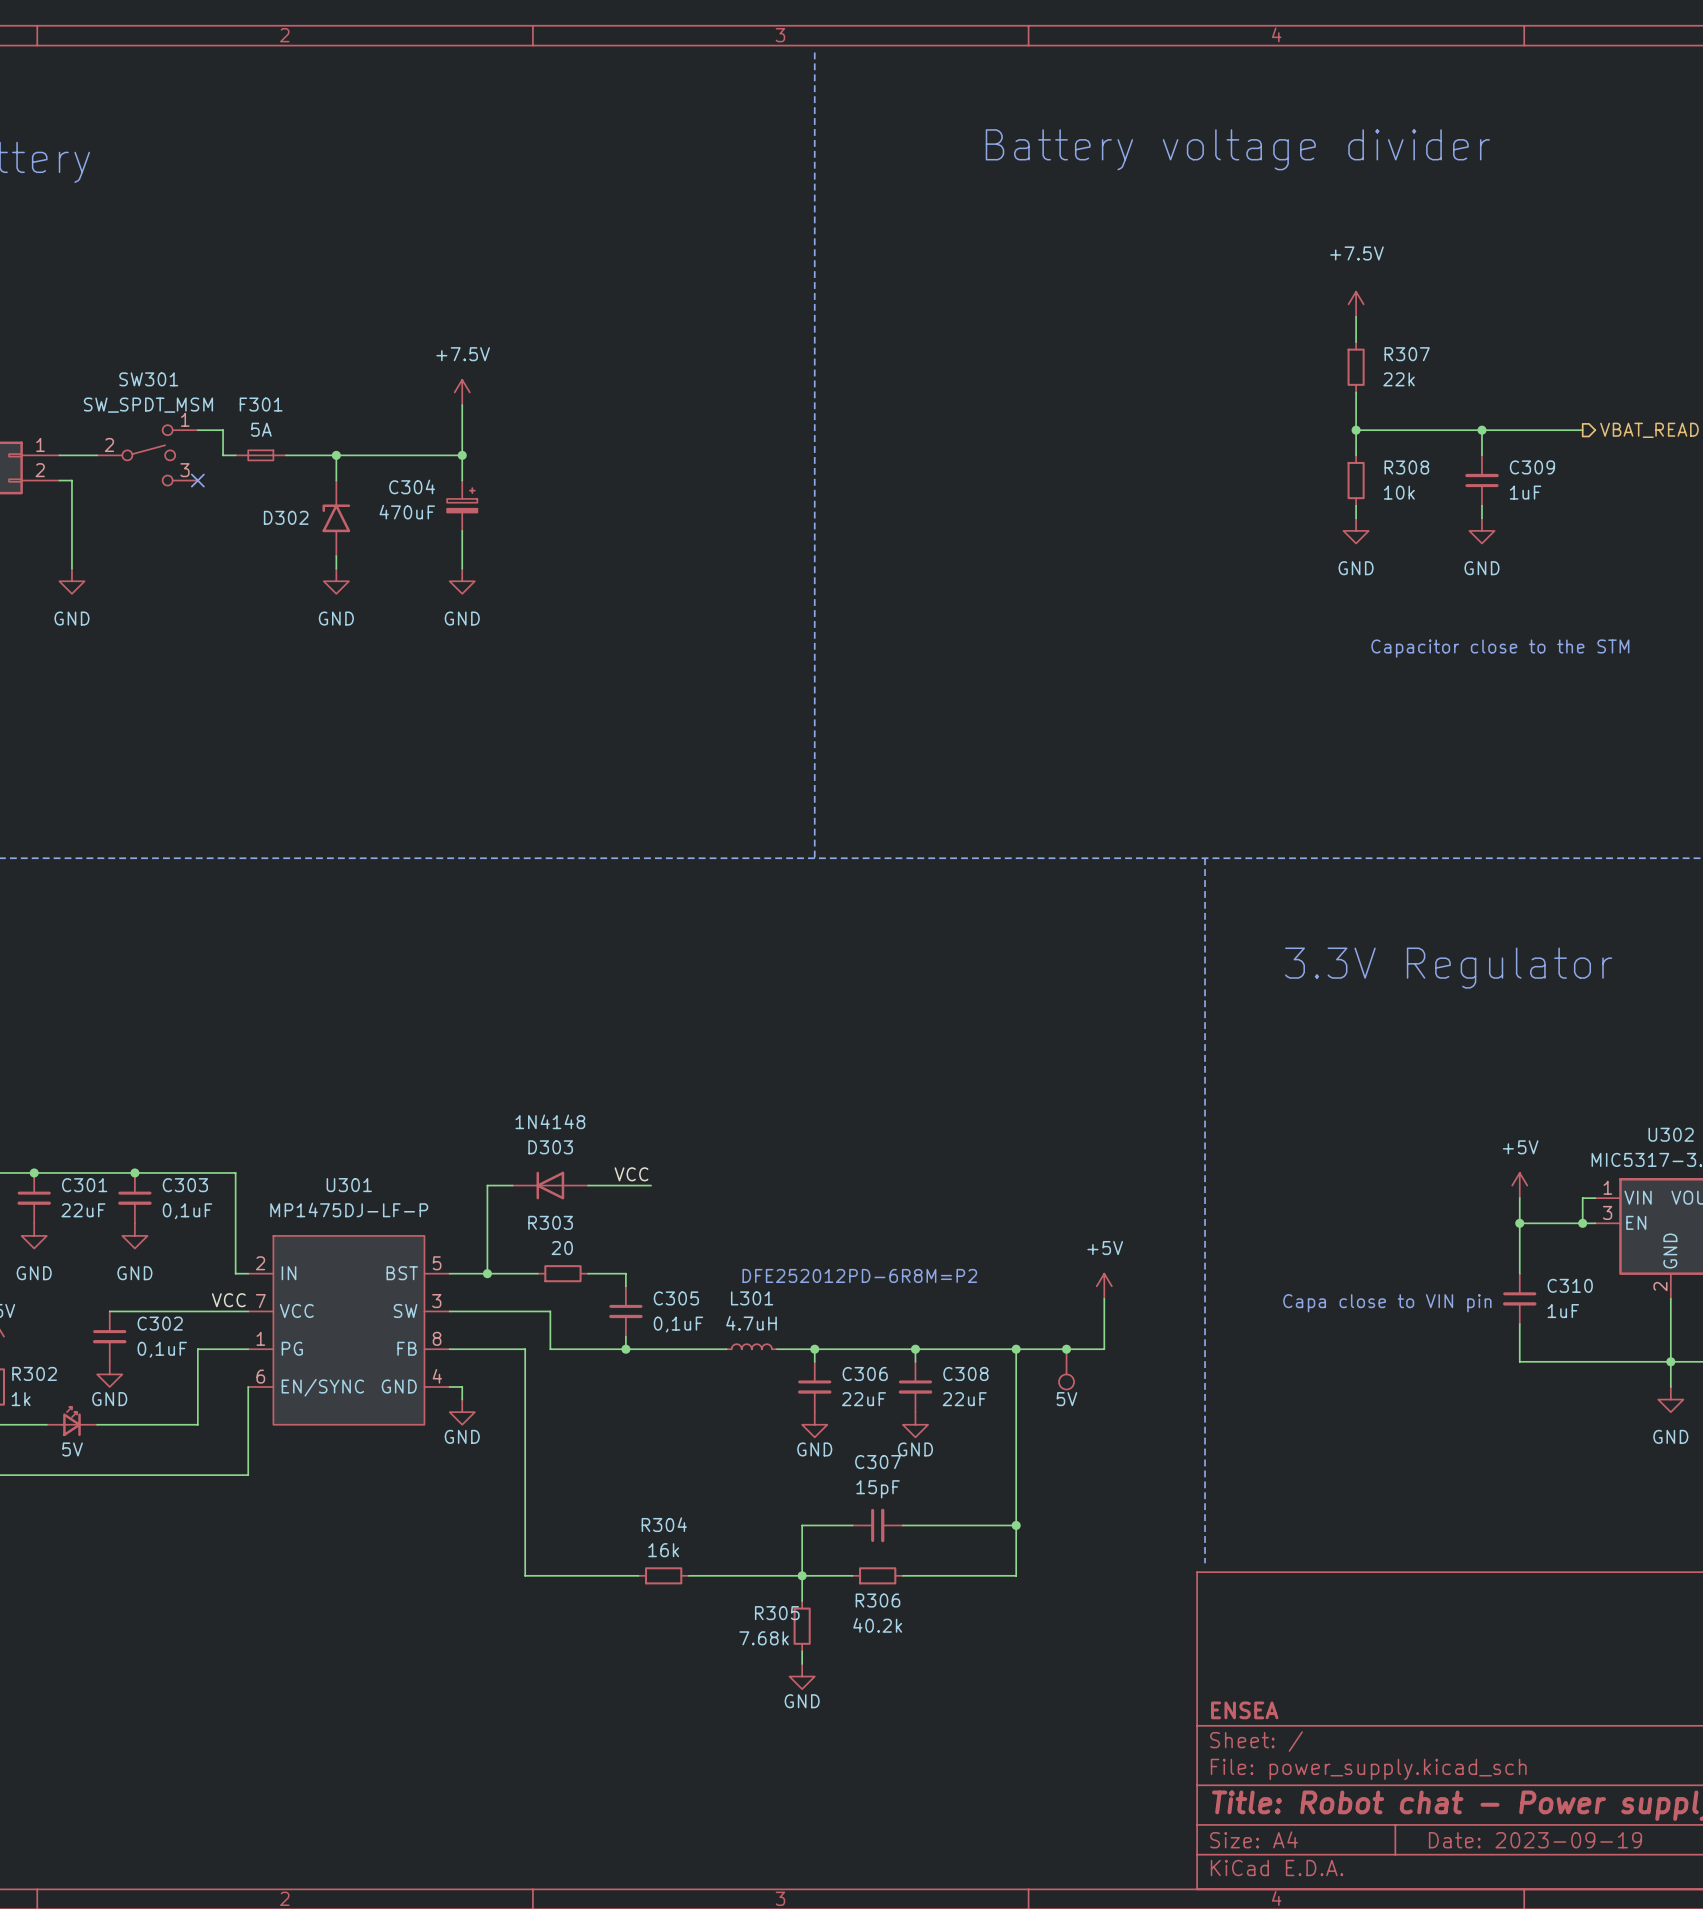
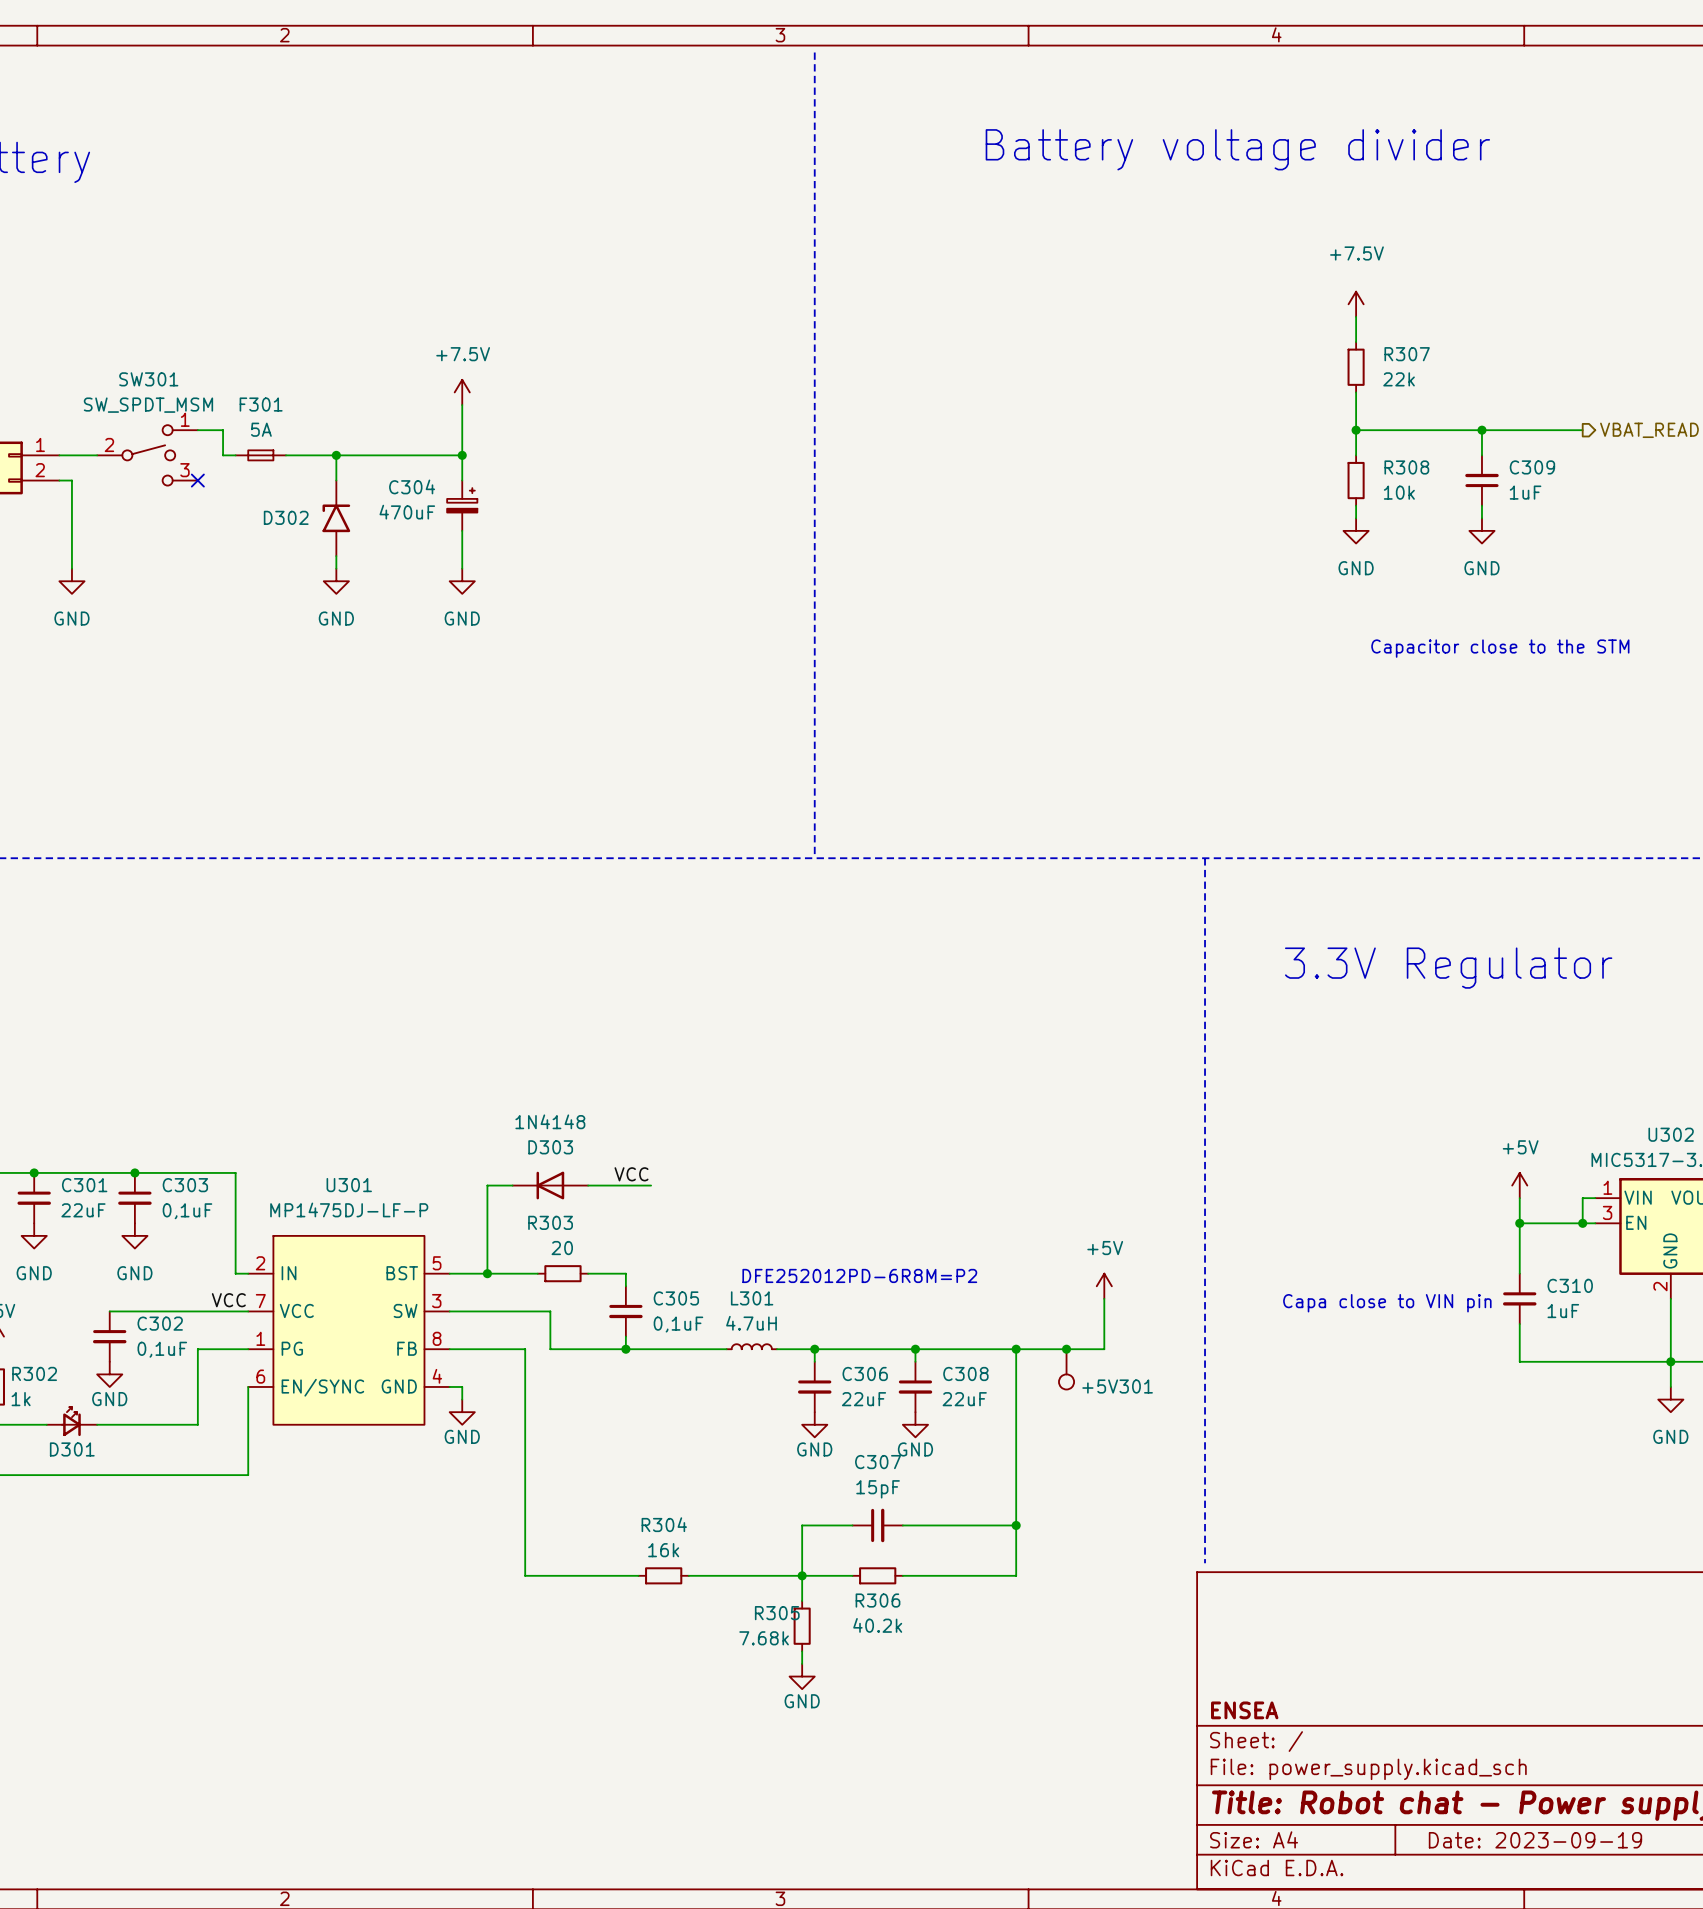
+5V301 name: none -> +5V301 (1117, 1386)
+5V301 value: 5V (1066, 1399) -> none
D301 name: none -> D301 (72, 1449)
D301 value: 5V (72, 1449) -> none

